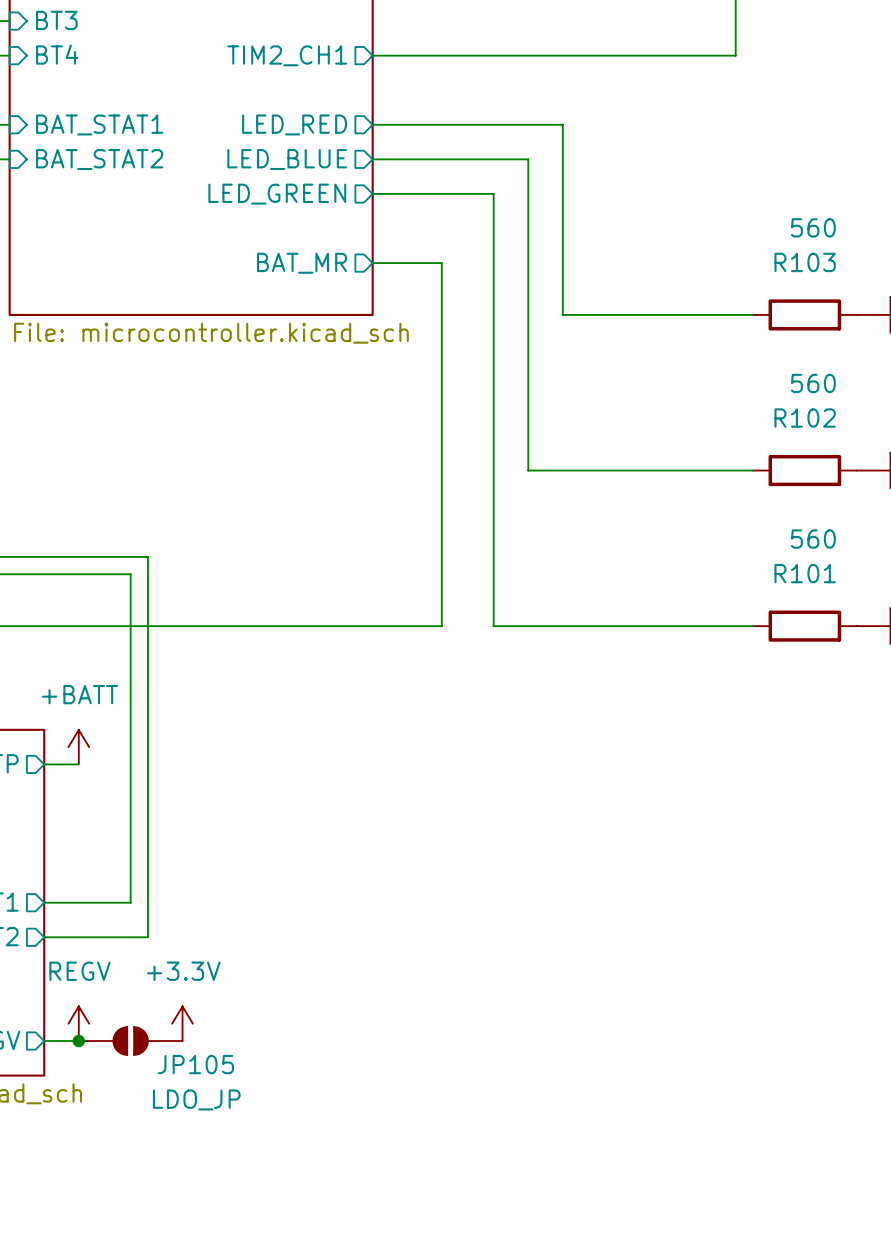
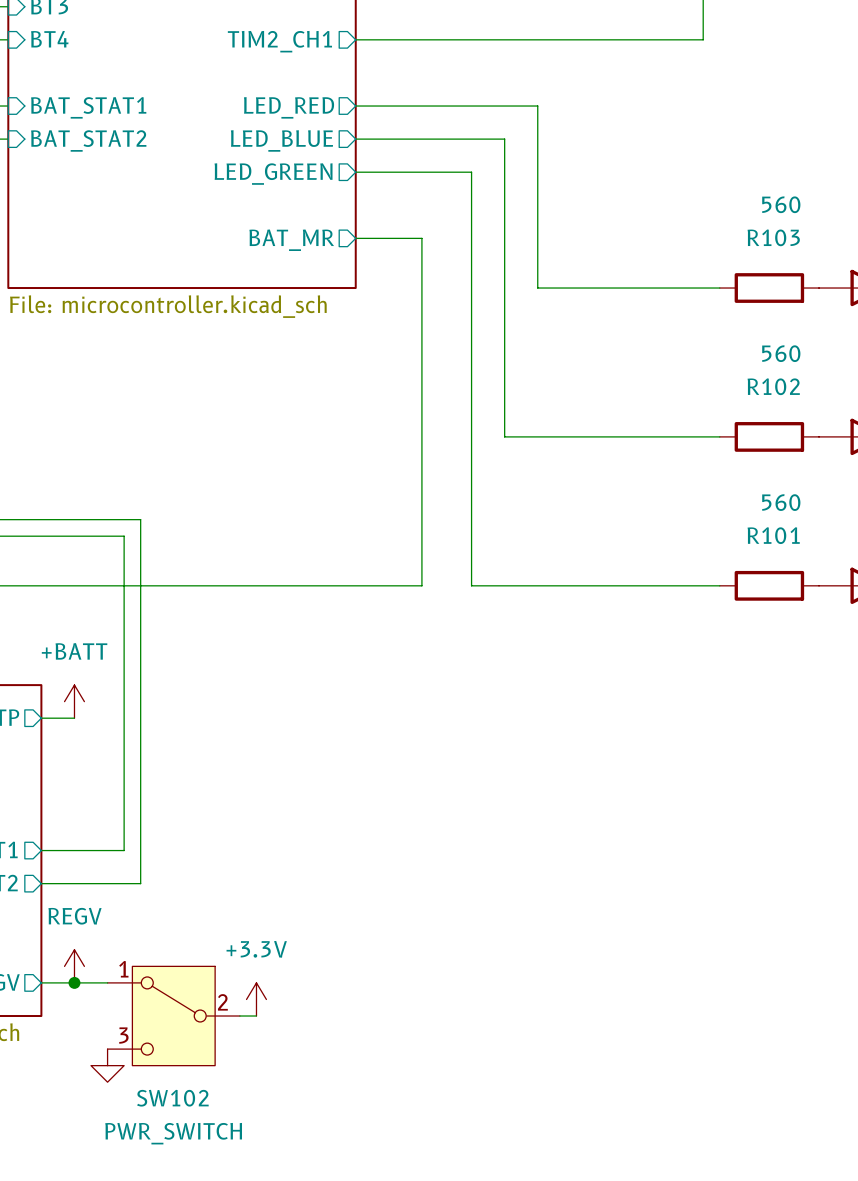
power symbol position: +3.3V (182, 1023) -> +3.3V (256, 999)
JP105: LDO_JP (130, 1041) -> none
SW102: none -> PWR_SWITCH (173, 1016)
wire: none -> (239, 1016) (256, 1016)
power symbol: none -> (107, 1065)

